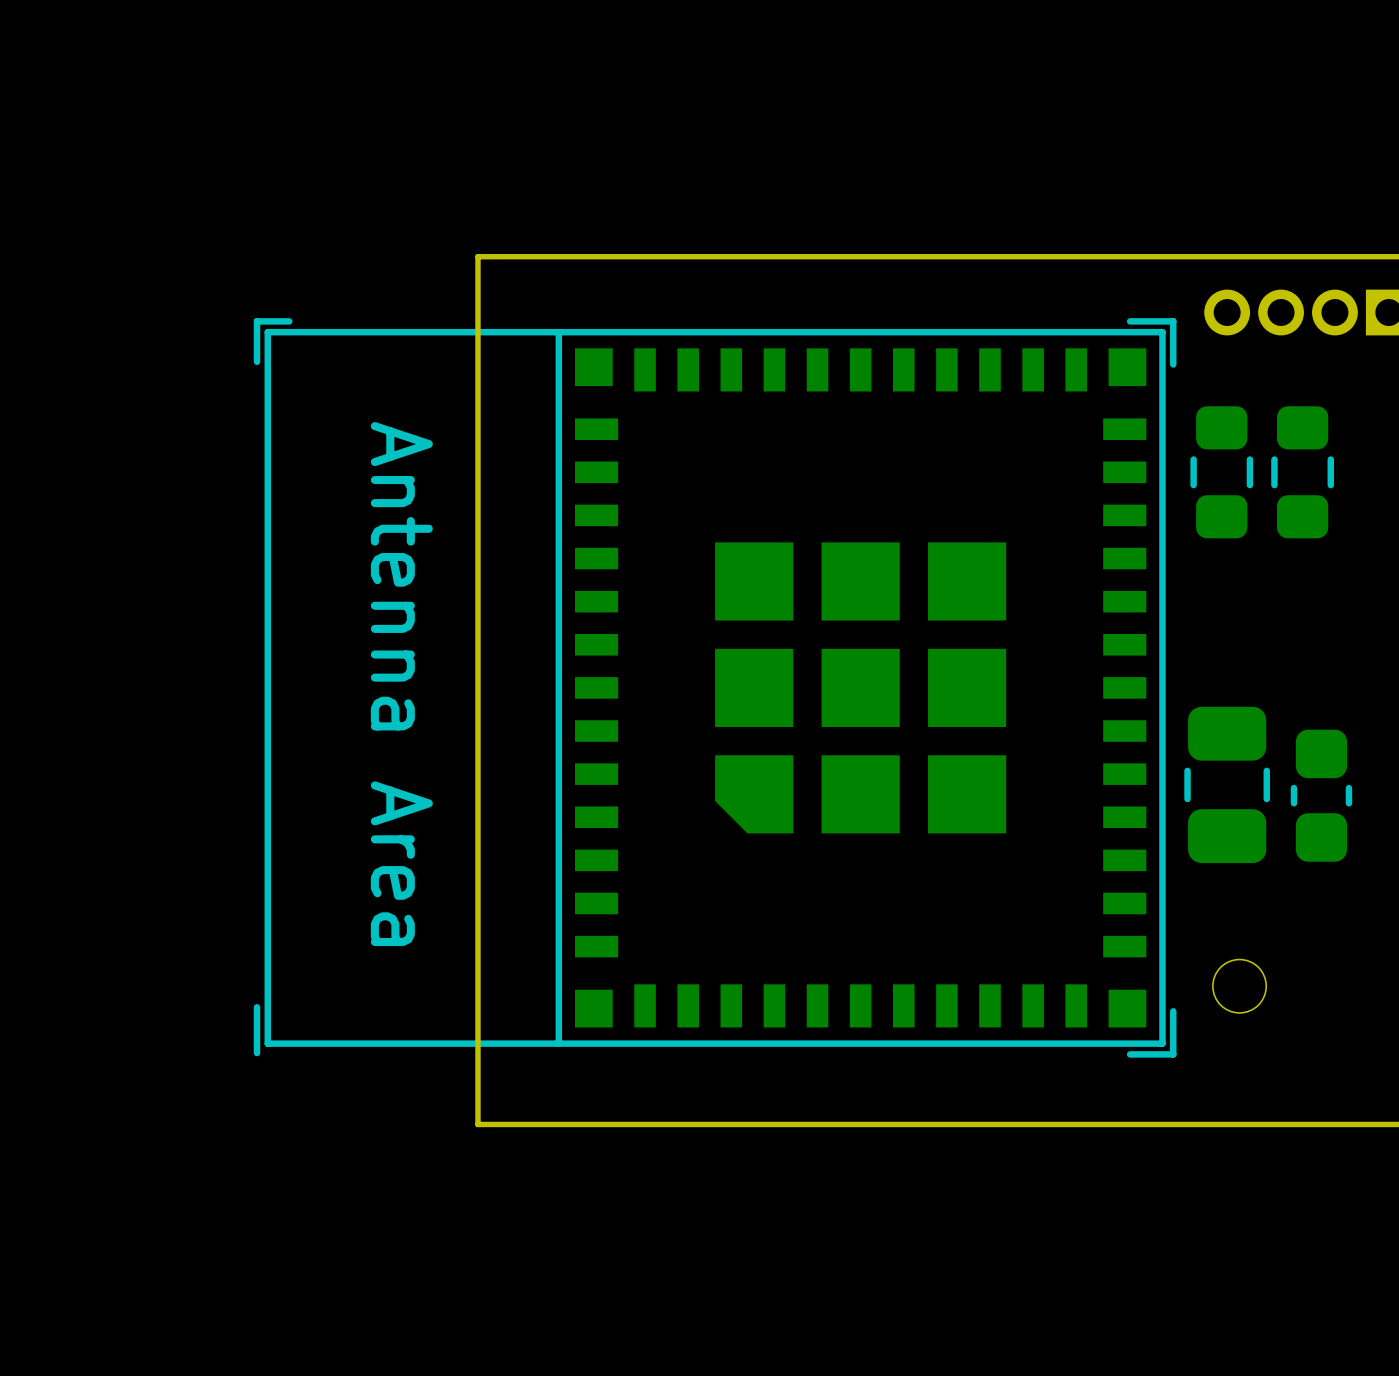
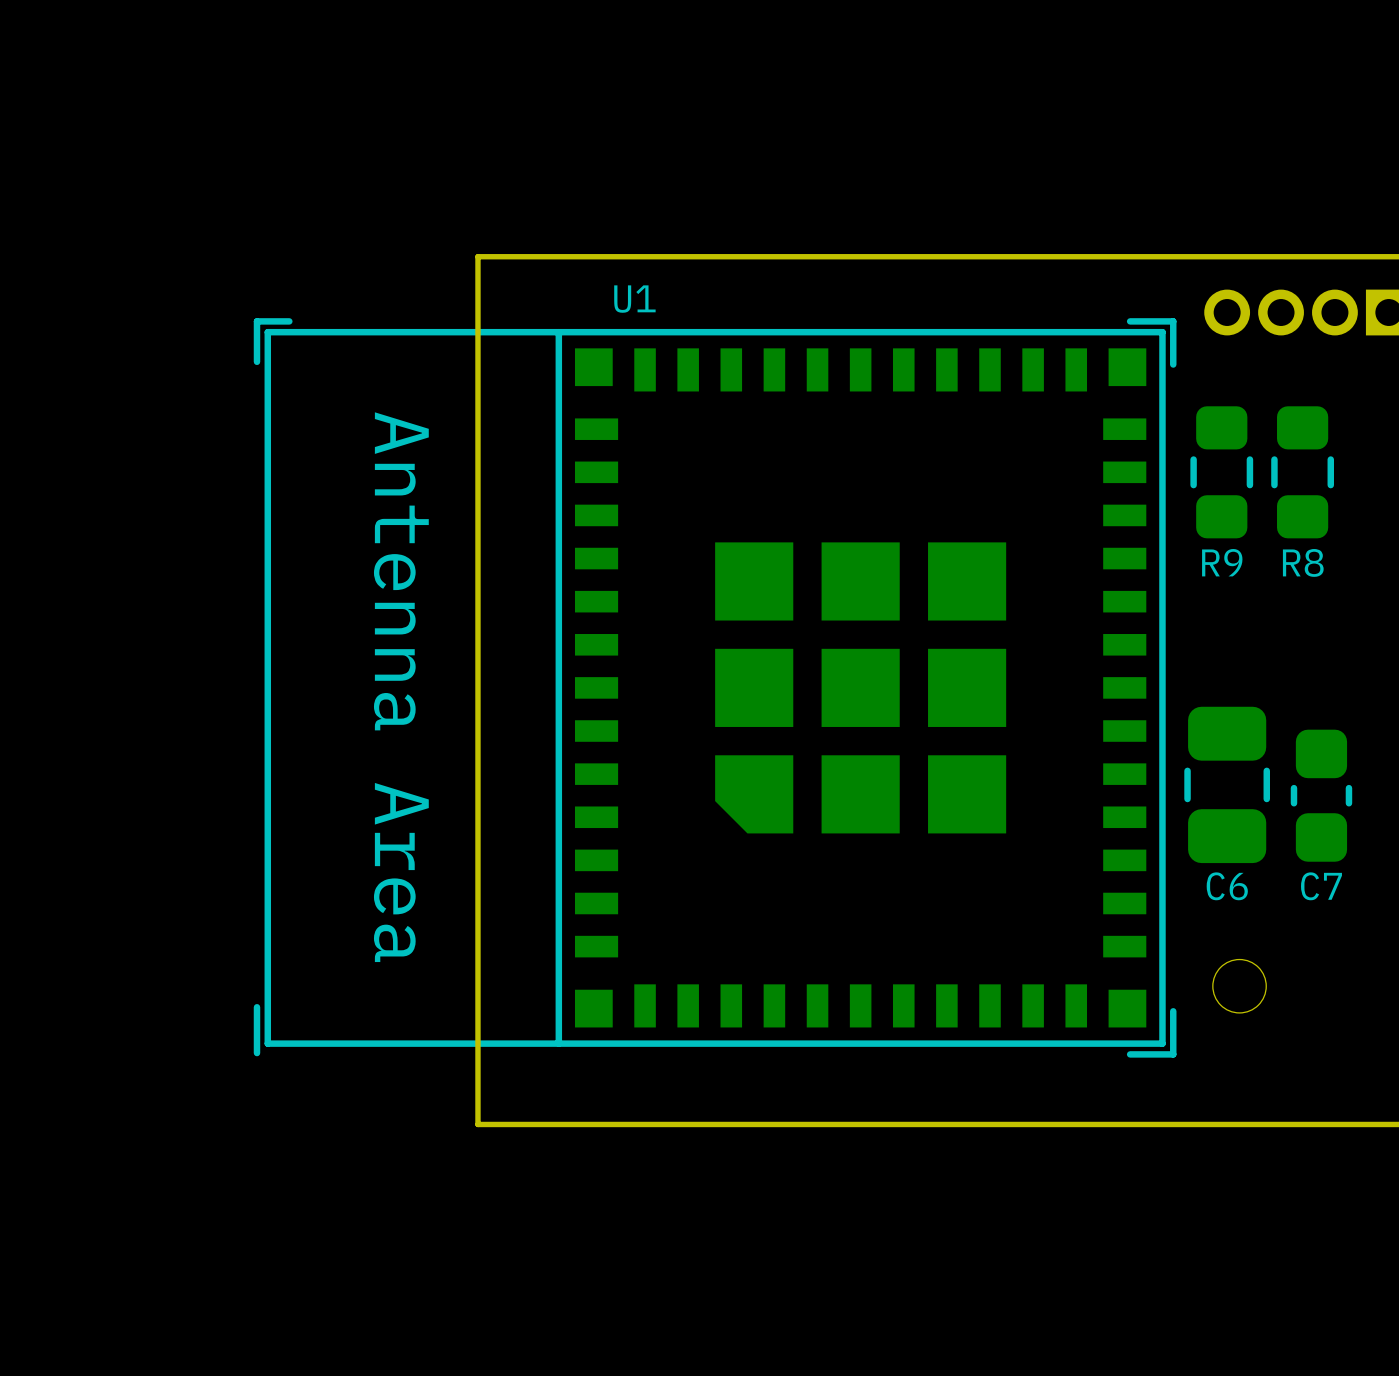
U1 name: none -> U1 (634, 299)
R9 name: none -> R9 (1222, 562)
R8 name: none -> R8 (1303, 562)
C6 name: none -> C6 (1227, 886)
C7 name: none -> C7 (1321, 886)

